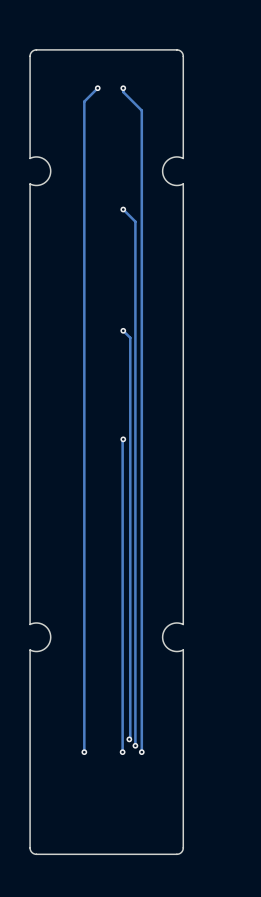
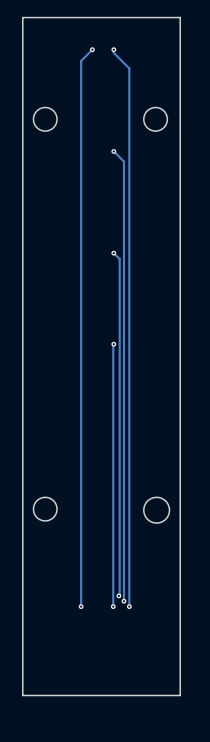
board edge: (176, 49) (181, 51) (183, 56) (183, 158) (176, 156) (169, 159) (164, 164) (162, 171) (164, 178) (169, 183) (176, 185) (183, 183) (183, 624) (176, 622) (169, 625) (164, 630) (162, 637) (164, 644) (169, 649) (176, 651) (183, 650) (183, 847) (181, 852) (176, 854) (36, 854) (31, 852) (30, 848) (30, 650) (37, 651) (43, 649) (48, 644) (50, 637) (48, 630) (43, 625) (37, 622) (30, 624) (30, 183) (37, 185) (43, 183) (48, 178) (50, 171) (48, 164) (43, 159) (37, 156) (30, 158) (30, 56) (31, 51) (36, 49) -> (158, 17) (180, 17) (180, 695) (22, 695) (22, 17) (40, 17)
round board edge: none -> [33, 107, 58, 132]
round board edge: none -> [143, 107, 168, 132]
round board edge: none -> [33, 497, 58, 522]
round board edge: none -> [143, 497, 170, 524]

